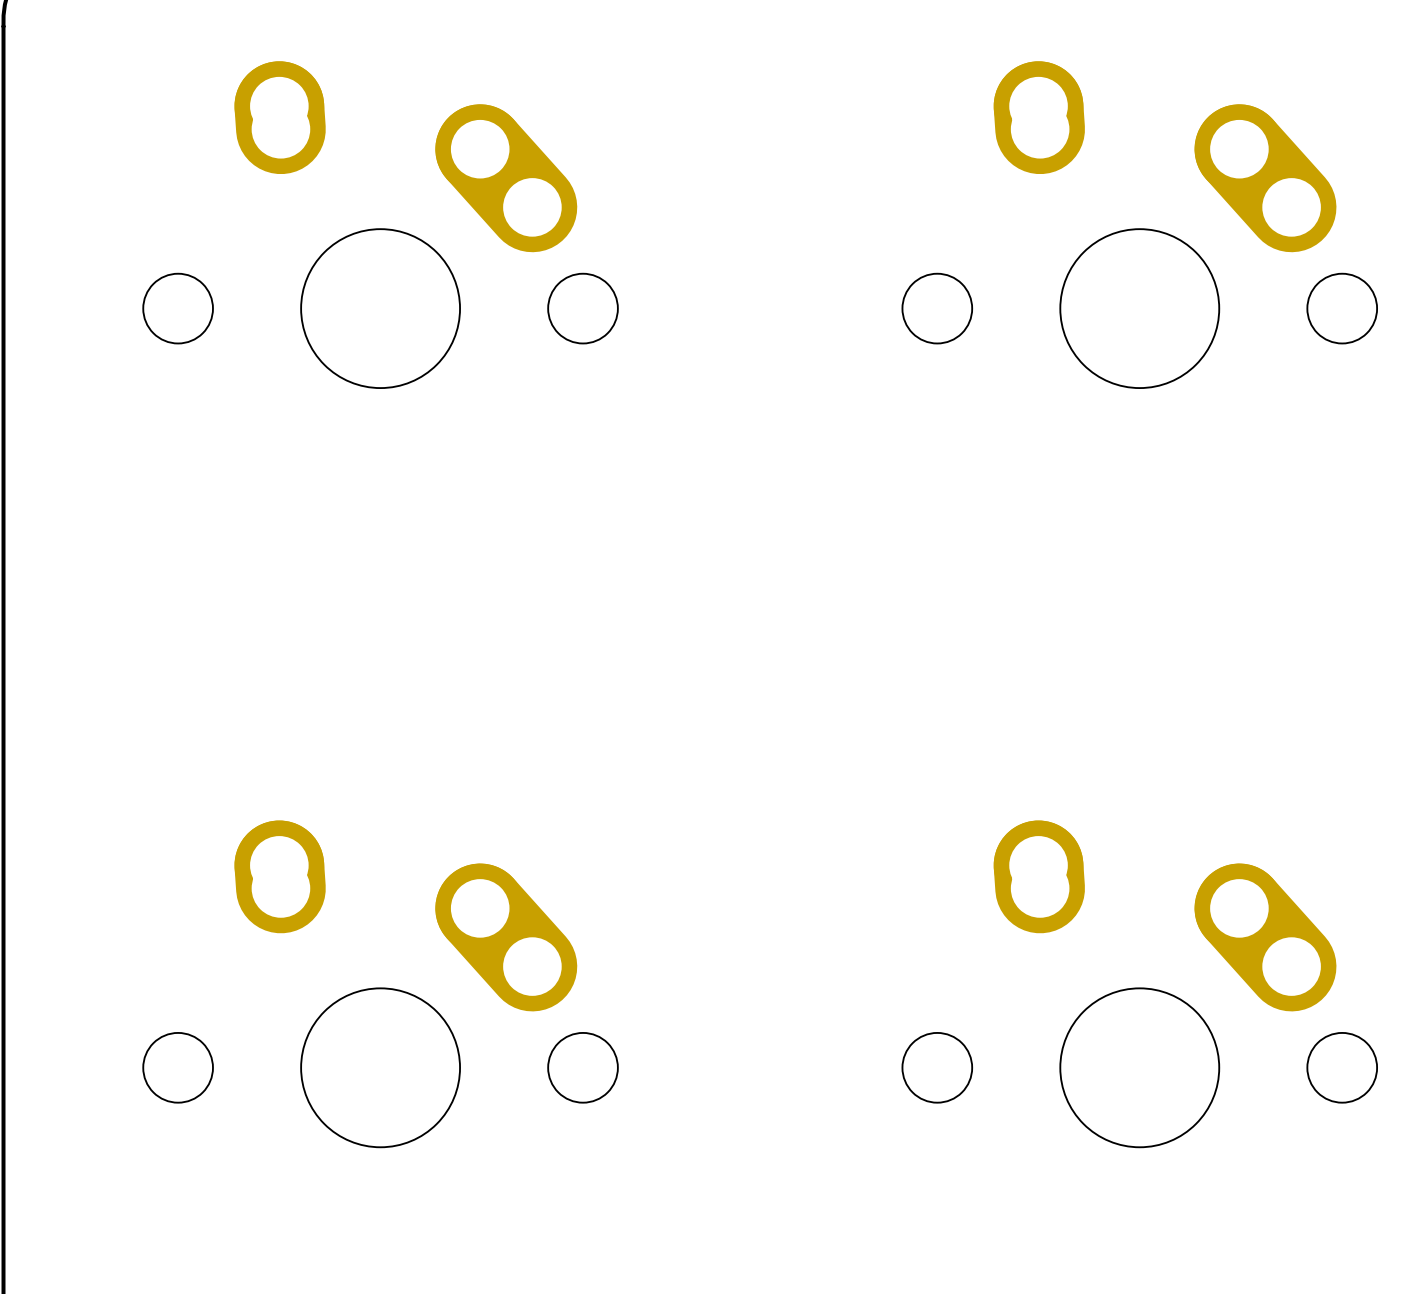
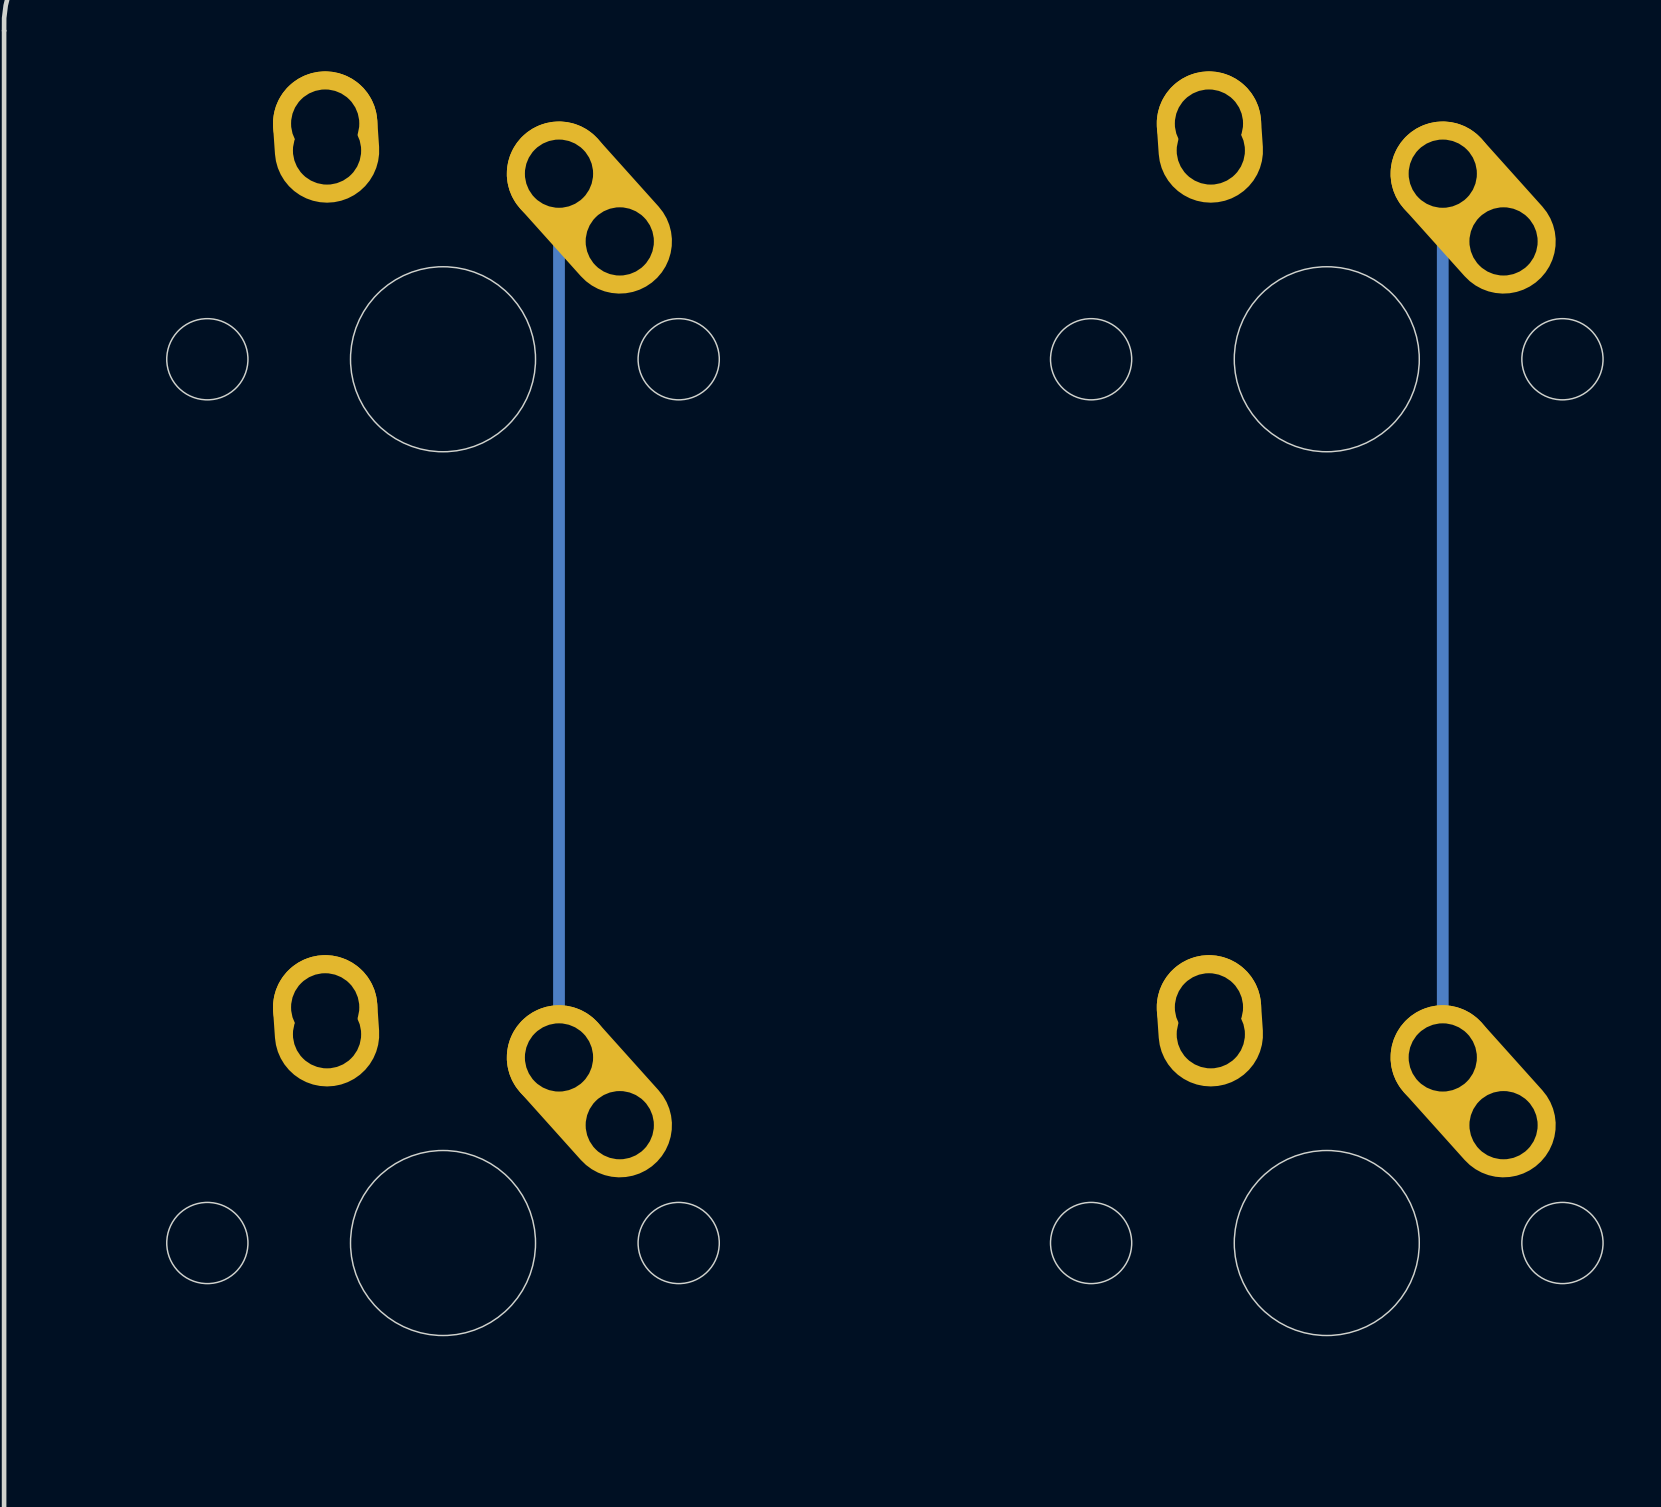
track: none -> (558, 173) (558, 1057)
track: none -> (1442, 173) (1442, 1057)

